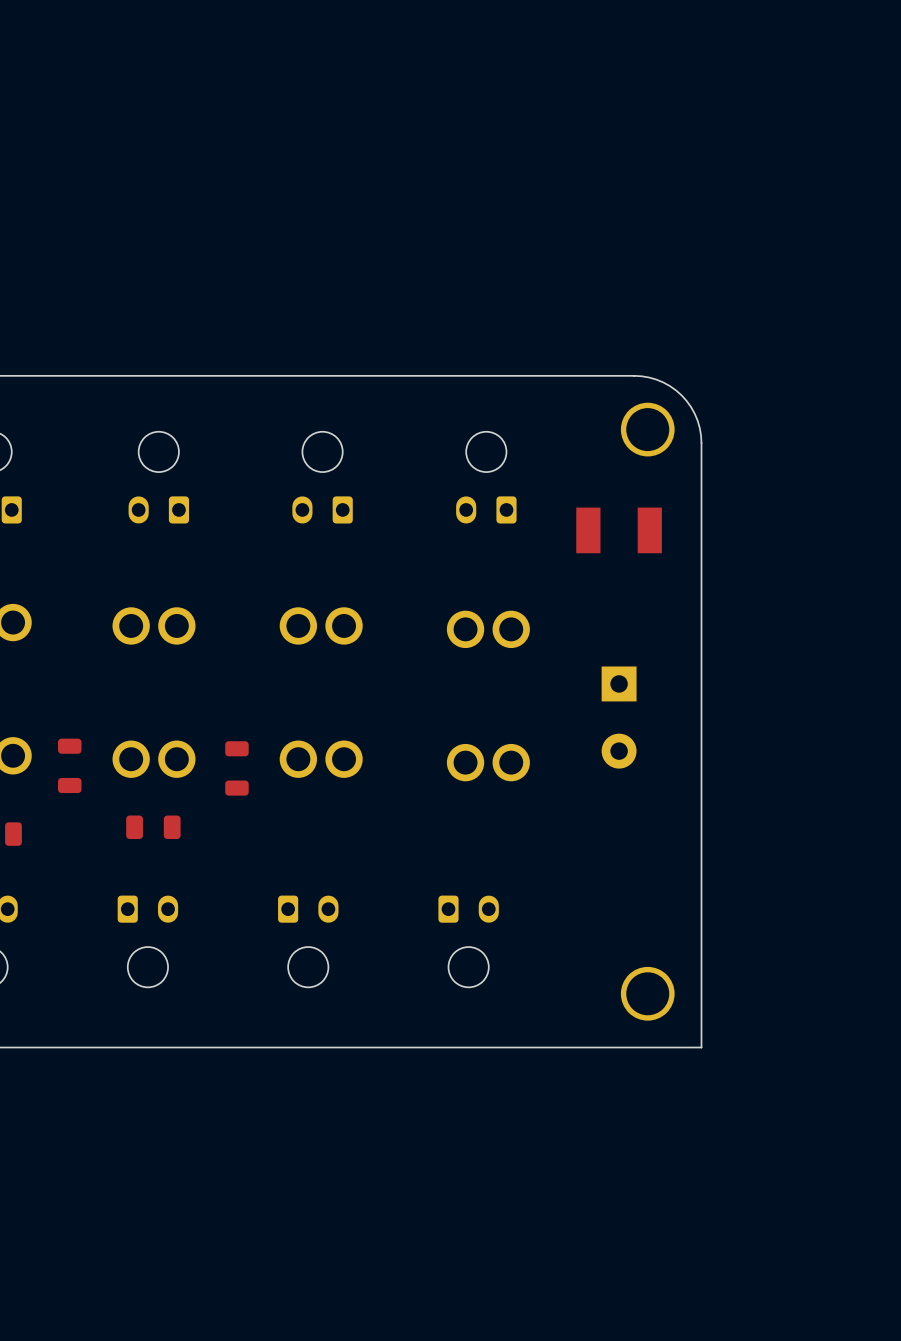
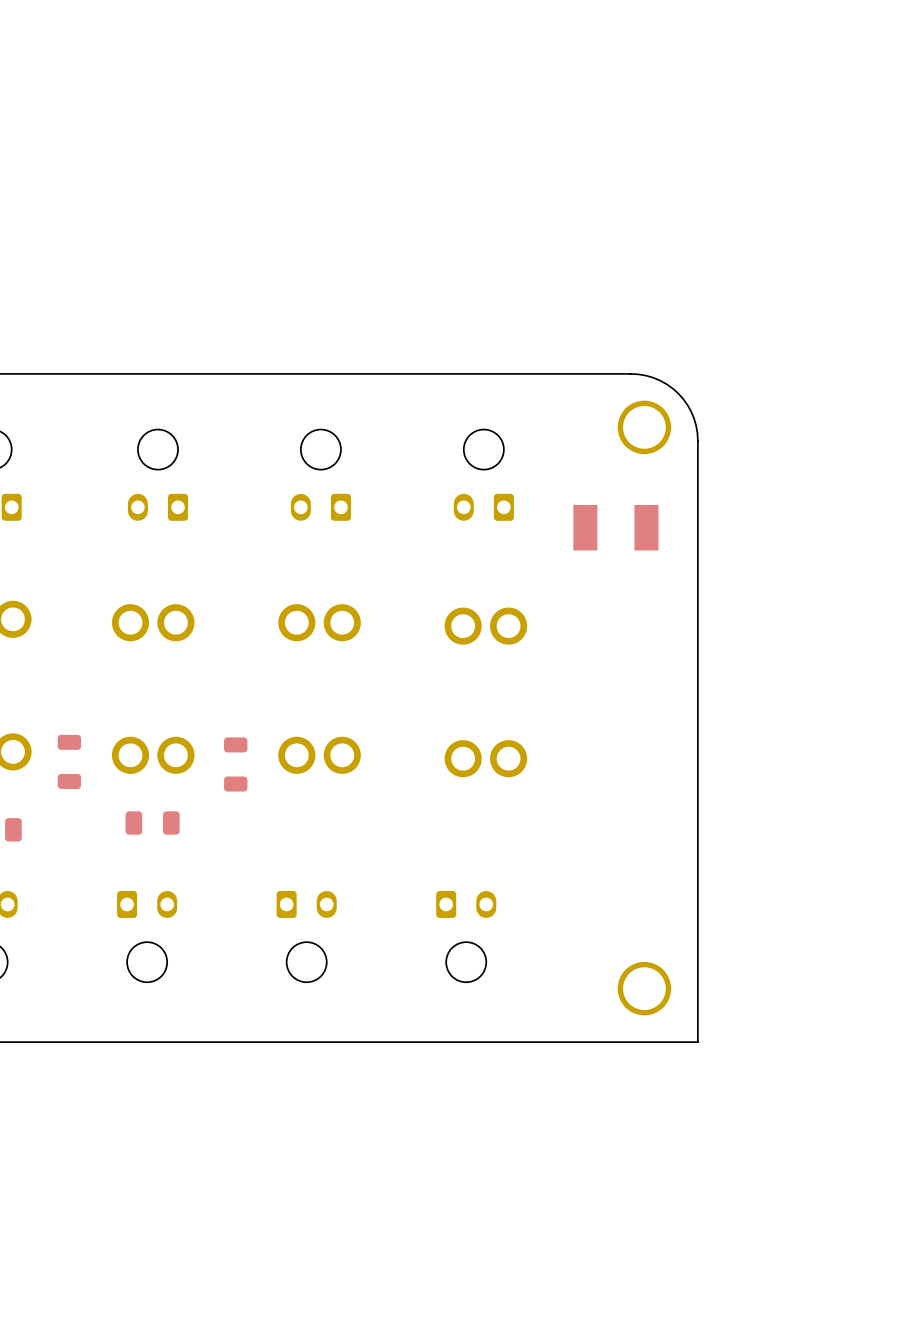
part: (619, 717) -> none

